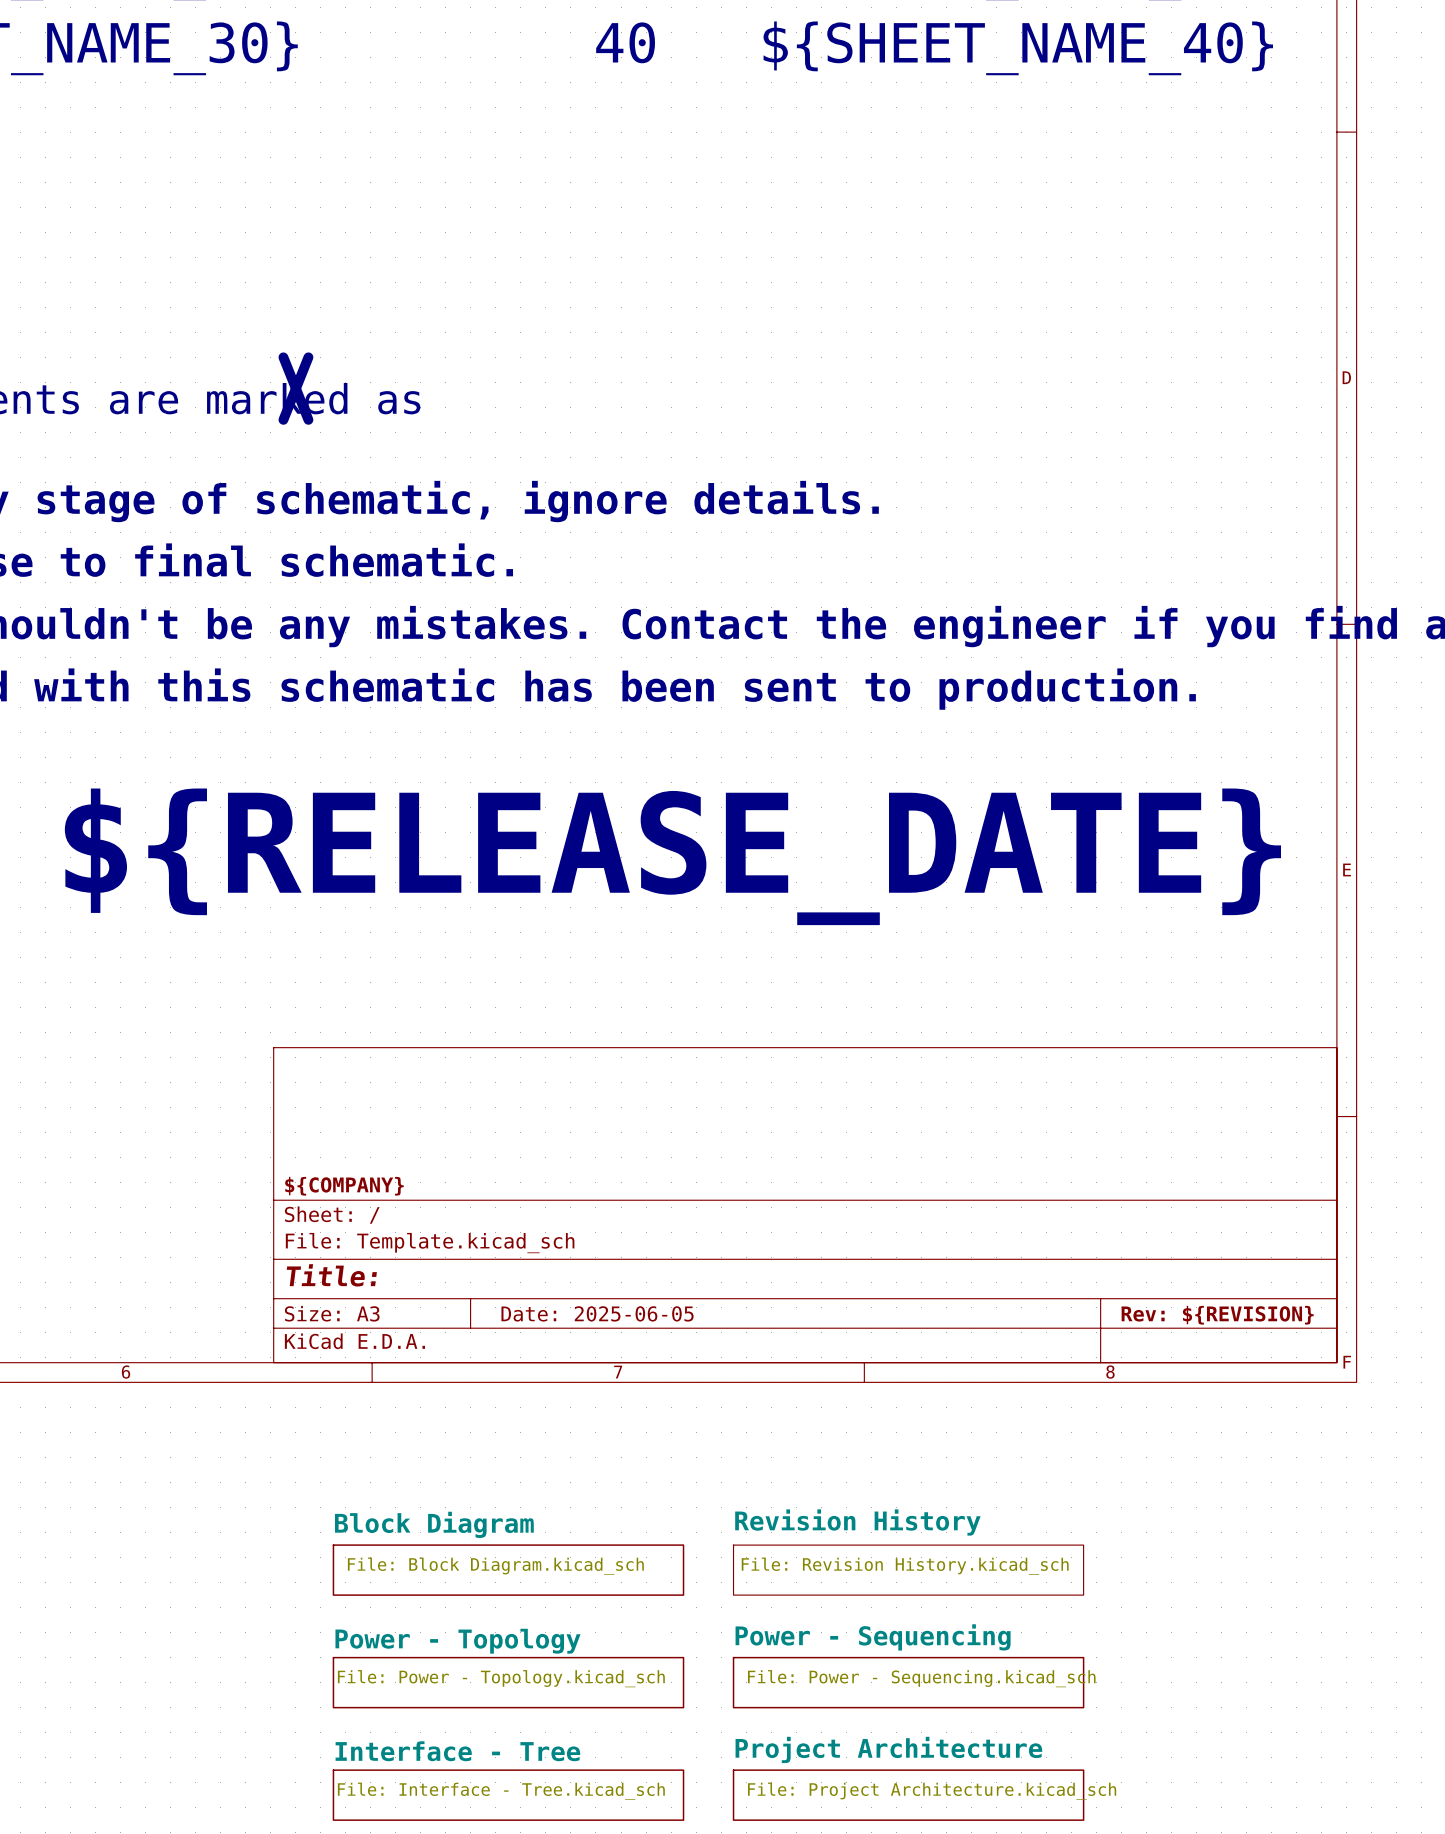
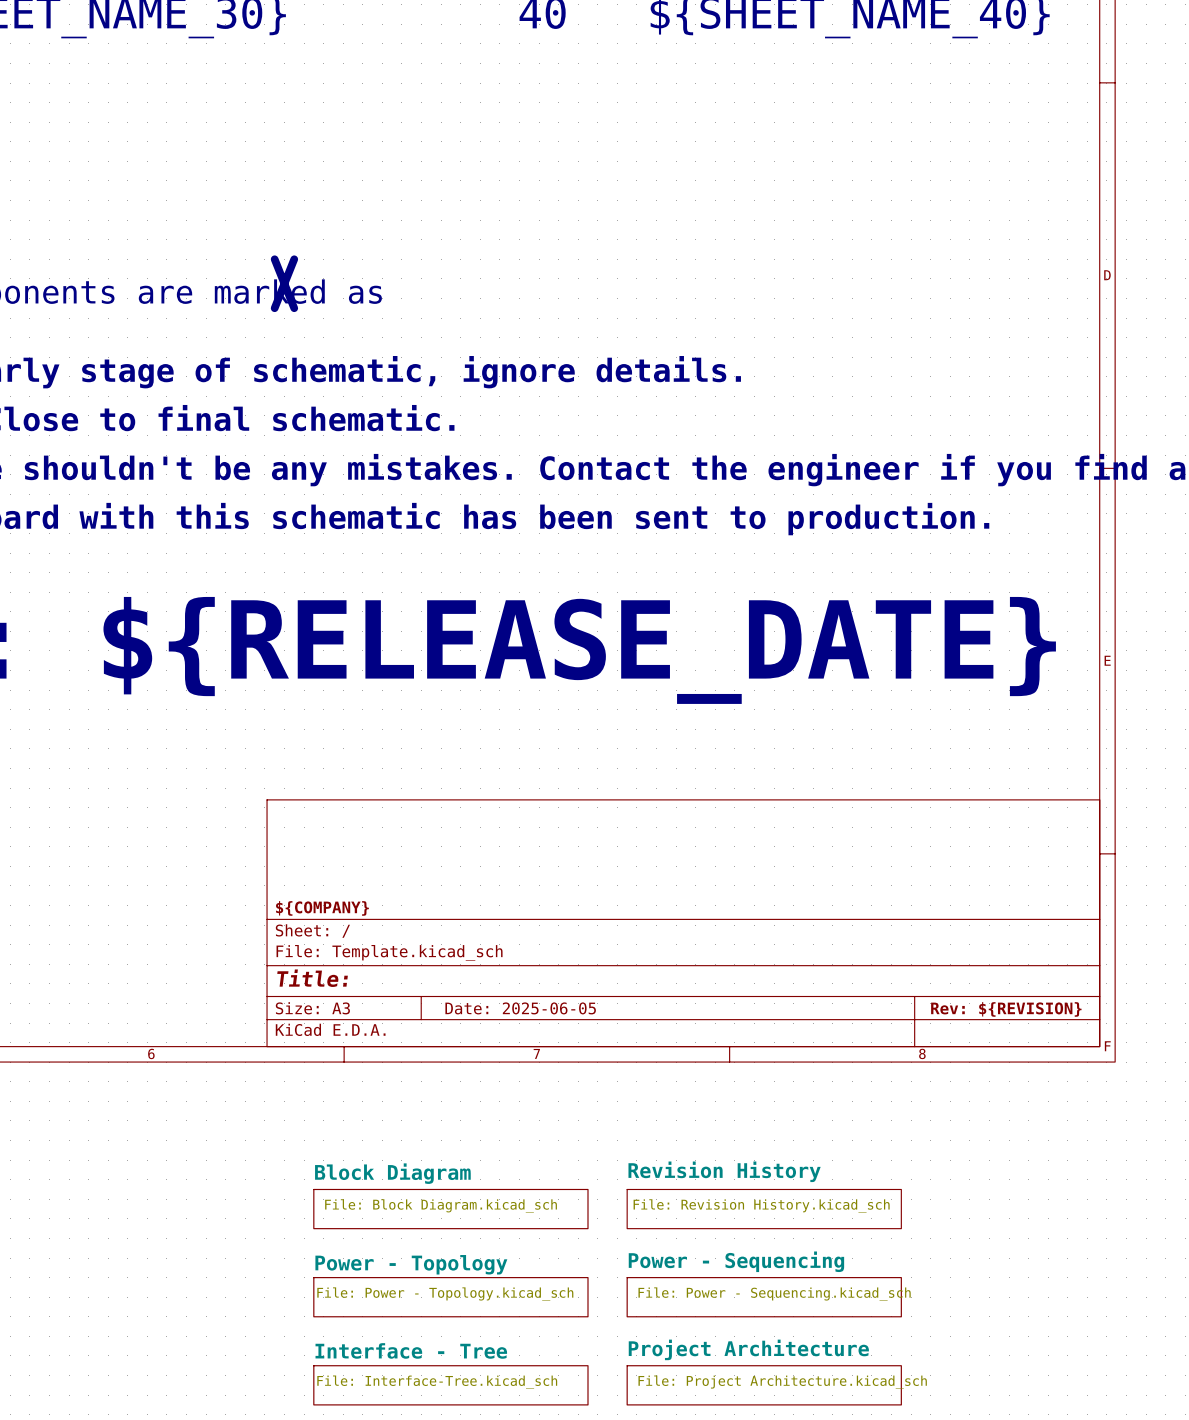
sheet Interface - Tree value: File: Interface - Tree.kicad_sch (501, 1791) -> File: Interface-Tree.kicad_sch (437, 1382)

